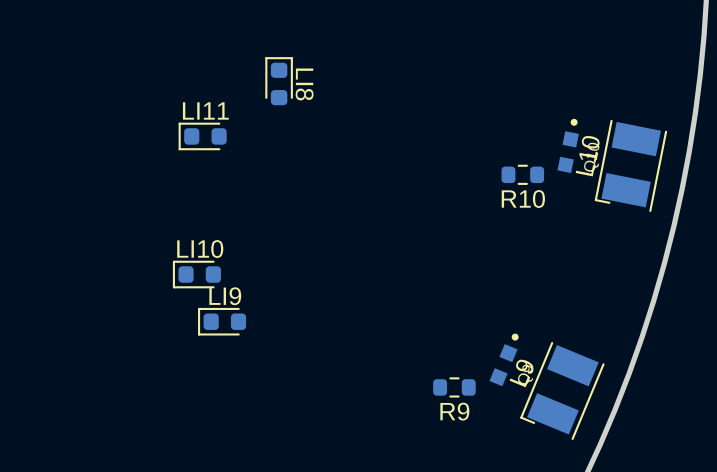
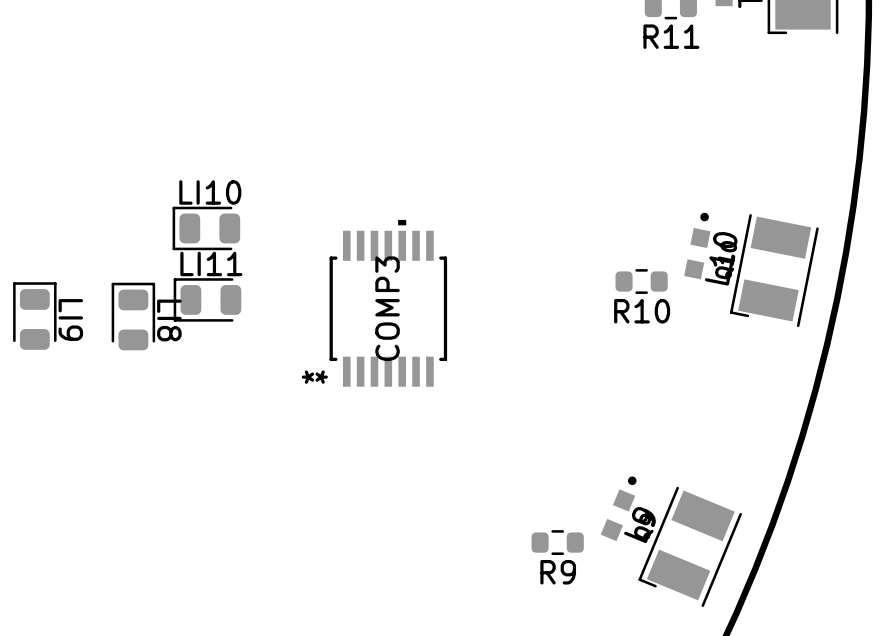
LI8 footprint: [265, 57, 293, 106] -> [111, 282, 156, 351]
LI11 footprint: [178, 122, 227, 151] -> [173, 278, 242, 322]
COMP3: none -> (388, 303)
LI10 footprint: [172, 260, 221, 289] -> [172, 206, 241, 251]
LI9 name position: LI9 (225, 296) -> LI9 (70, 319)
LI9 footprint: [198, 307, 247, 336] -> [13, 282, 57, 350]

